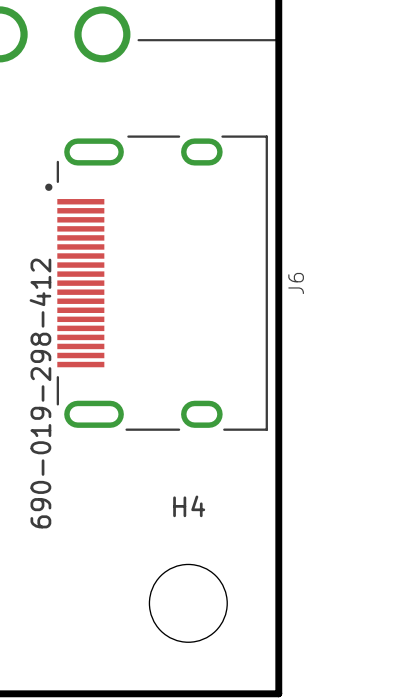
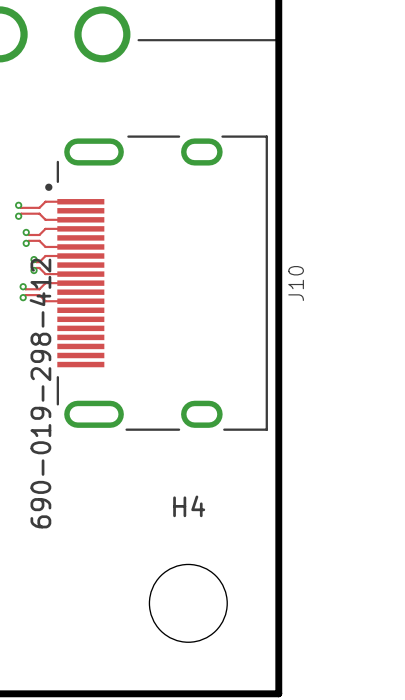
track: none -> (80, 201) (45, 201) (39, 207) (21, 207) (18, 205)
via: none -> (18, 205)
track: none -> (18, 216) (21, 213) (39, 213) (45, 219) (80, 219)
via: none -> (18, 216)
track: none -> (80, 228) (45, 228) (39, 234) (28, 234) (26, 232)
via: none -> (26, 232)
track: none -> (26, 243) (28, 240) (39, 240) (45, 246) (80, 246)
via: none -> (26, 243)
track: none -> (80, 256) (45, 256) (39, 262) (34, 259)
via: none -> (34, 259)
track: none -> (34, 270) (39, 267) (45, 274) (80, 274)
via: none -> (34, 270)
track: none -> (80, 283) (45, 283) (39, 289) (25, 289) (23, 286)
J6 name: J6 (296, 283) -> J10 (296, 283)
via: none -> (23, 286)
track: none -> (23, 297) (25, 295) (39, 295) (45, 301) (80, 301)
via: none -> (23, 297)

